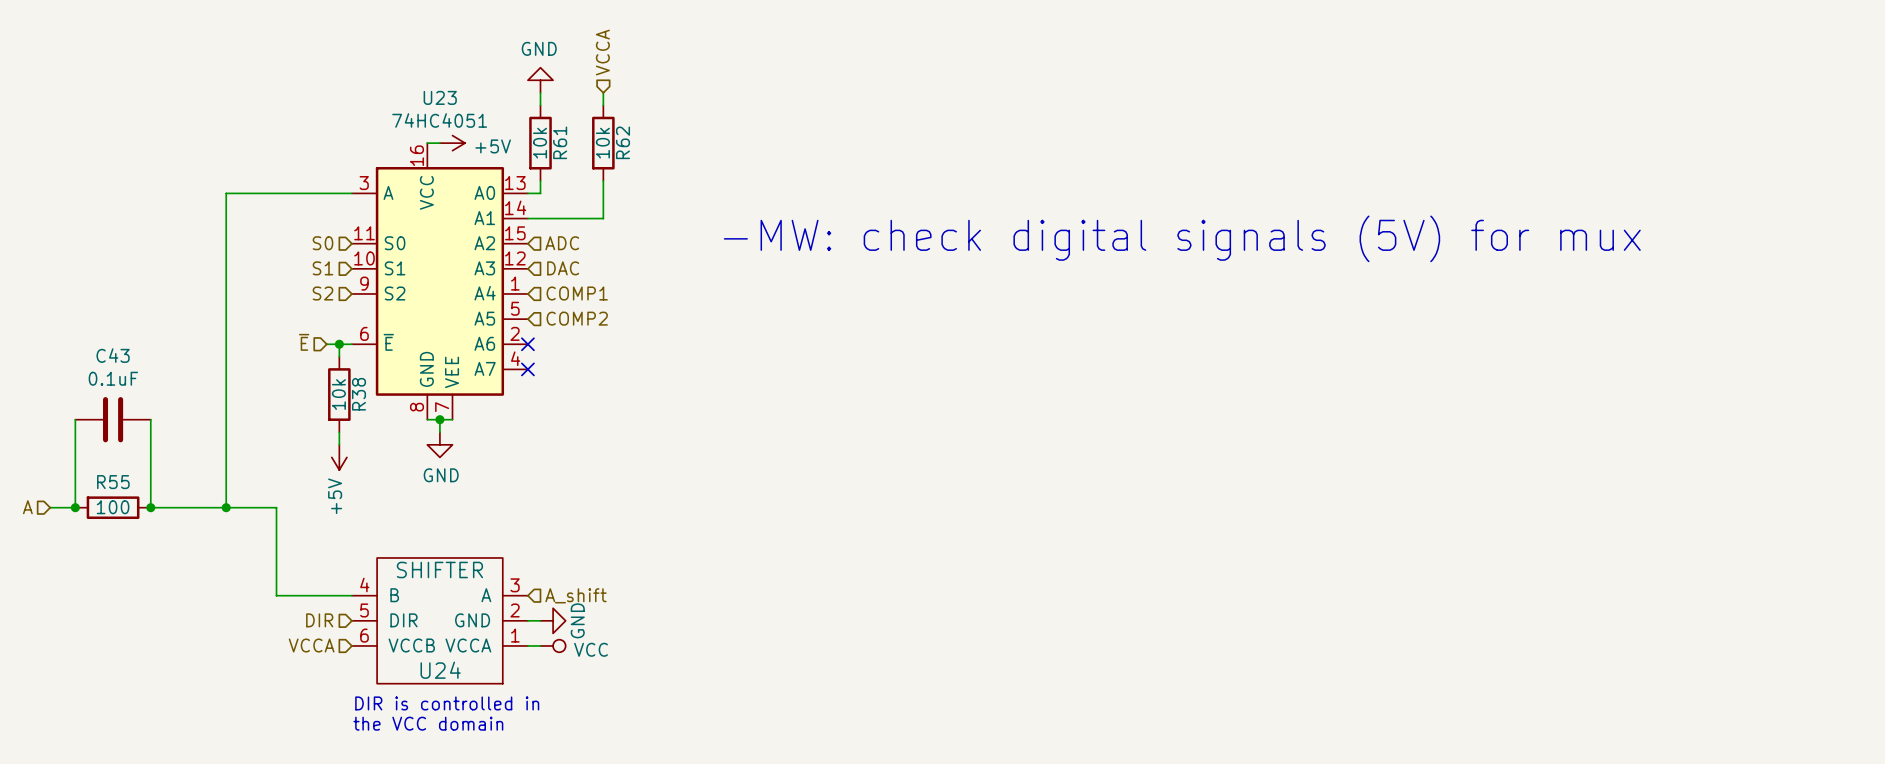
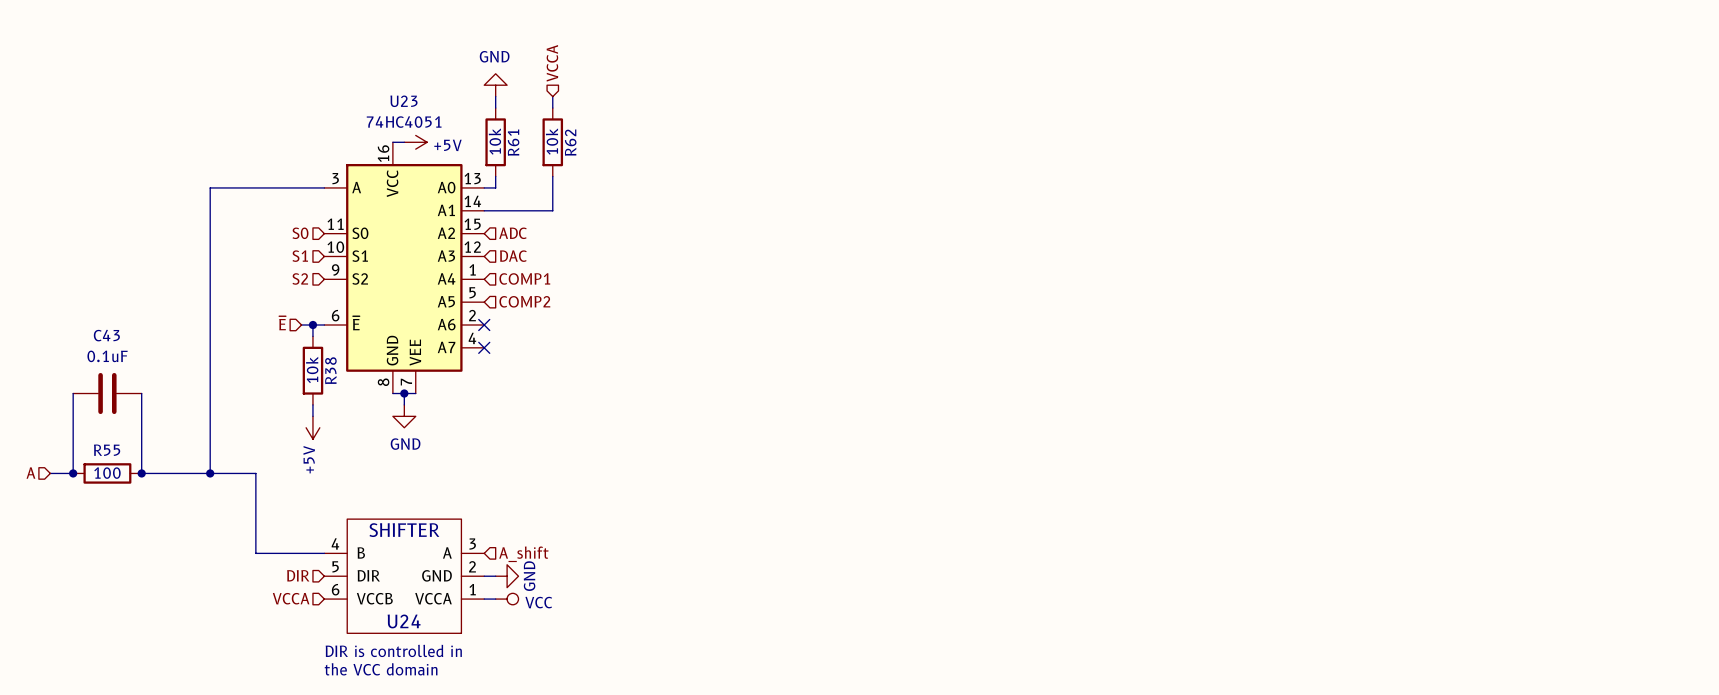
text: -MW: check digital signals (5V) for mux (1182, 238) -> none

